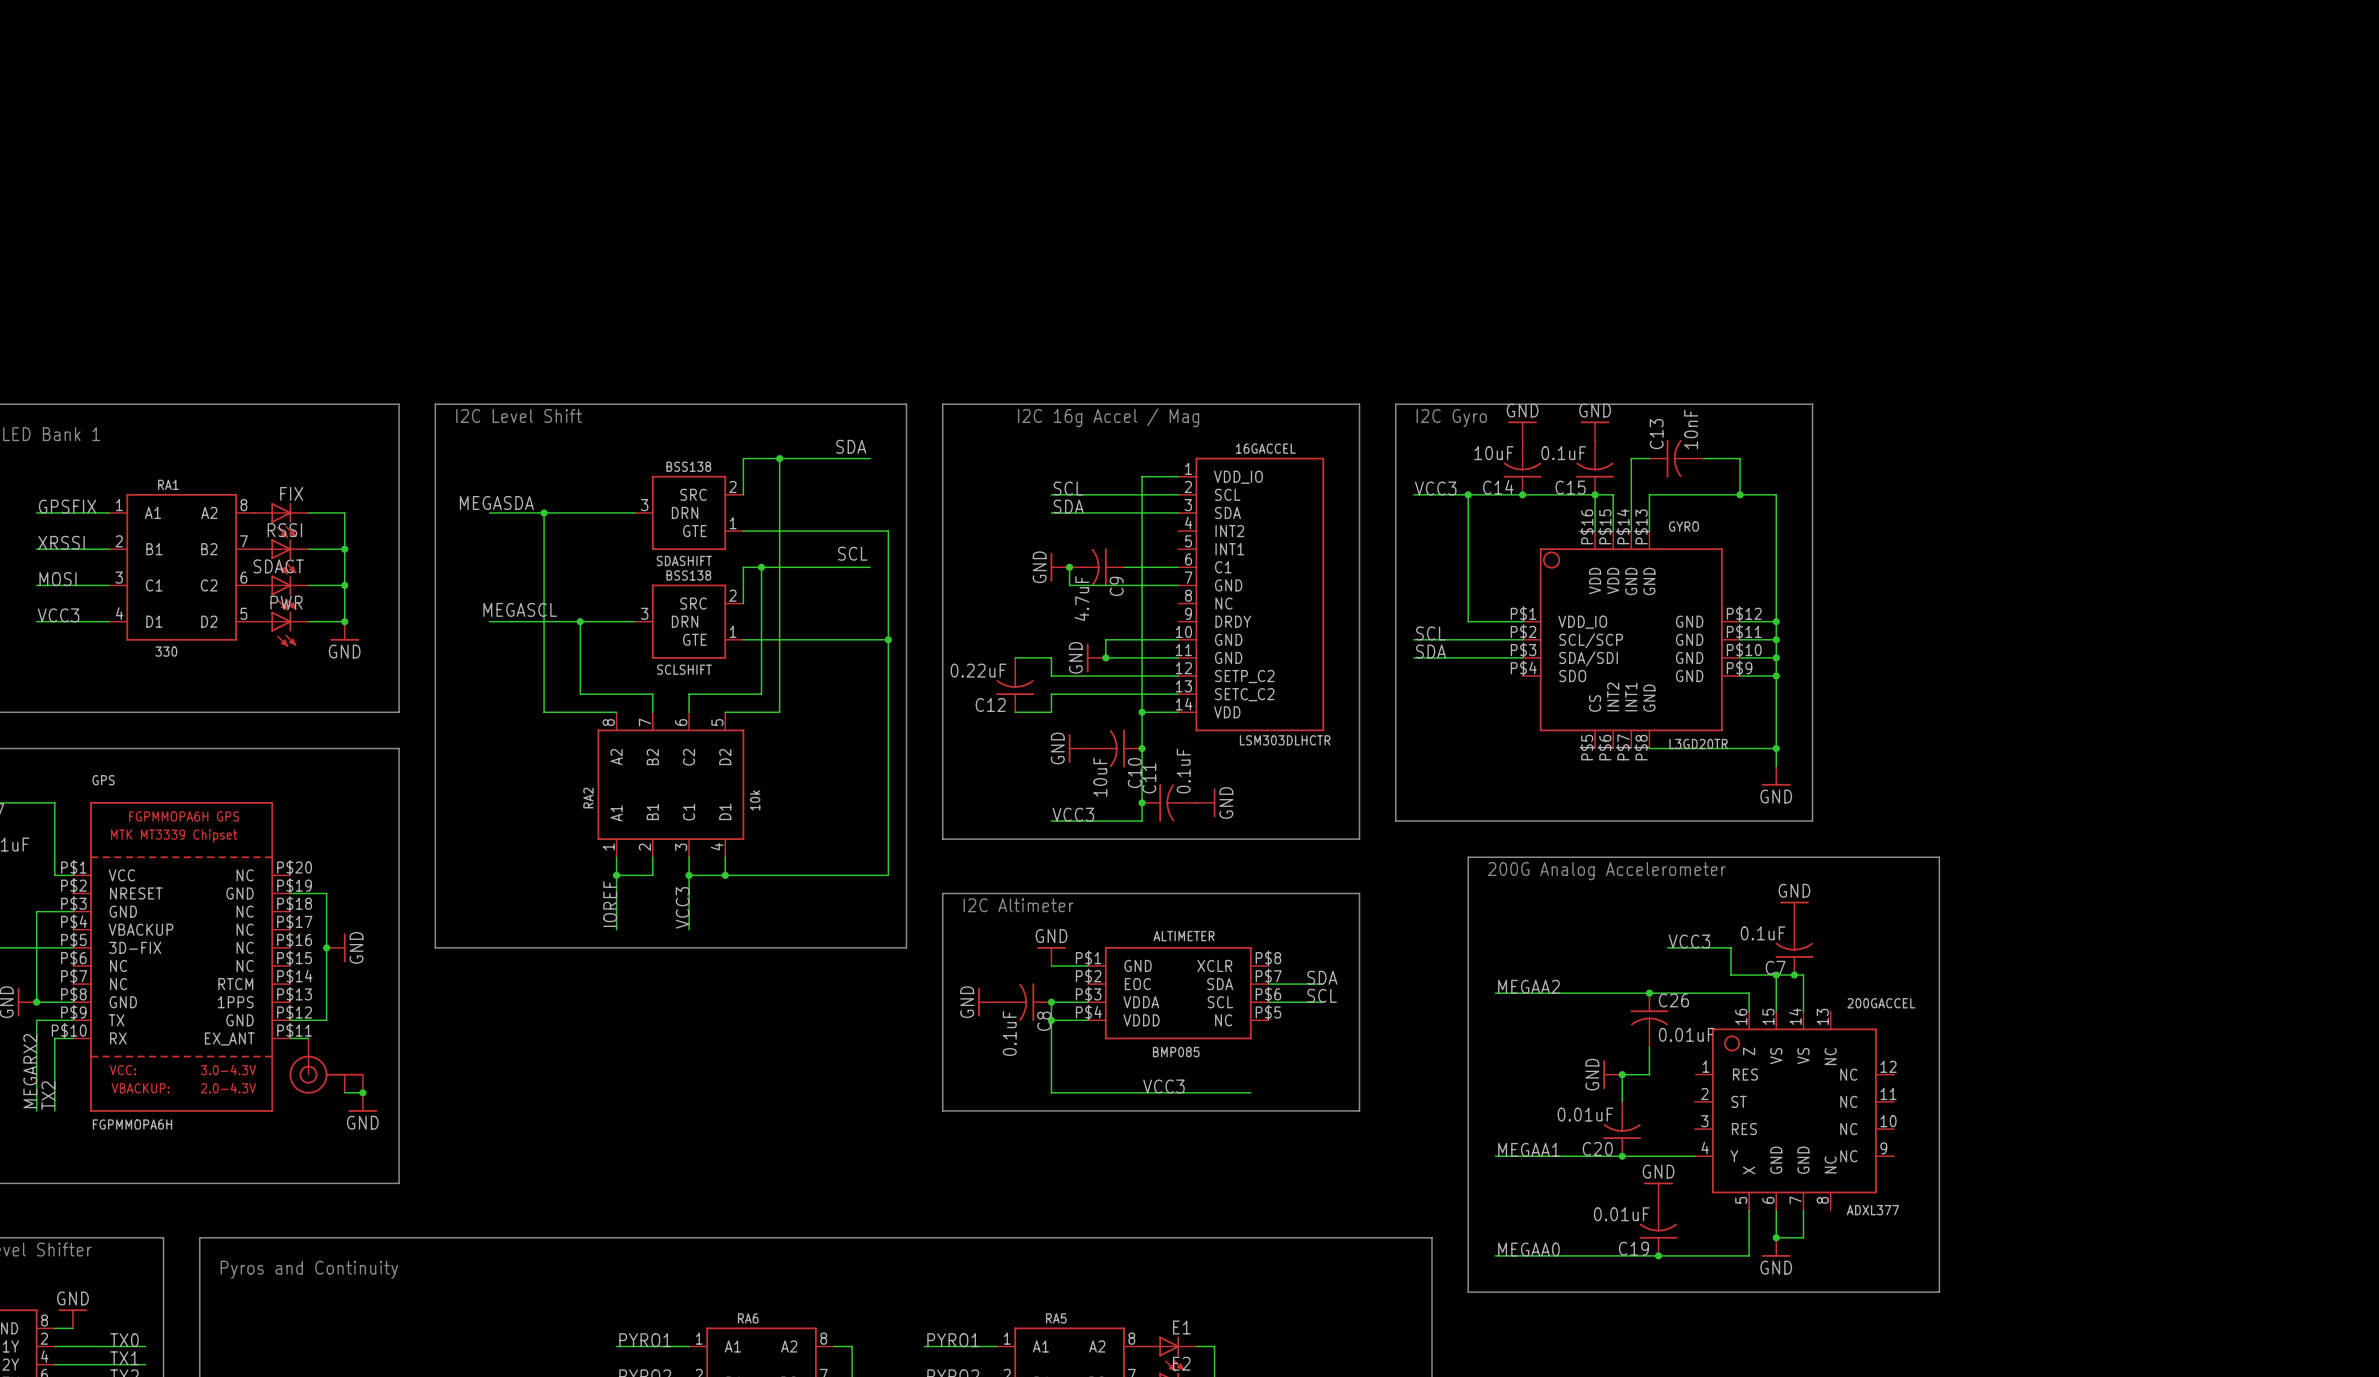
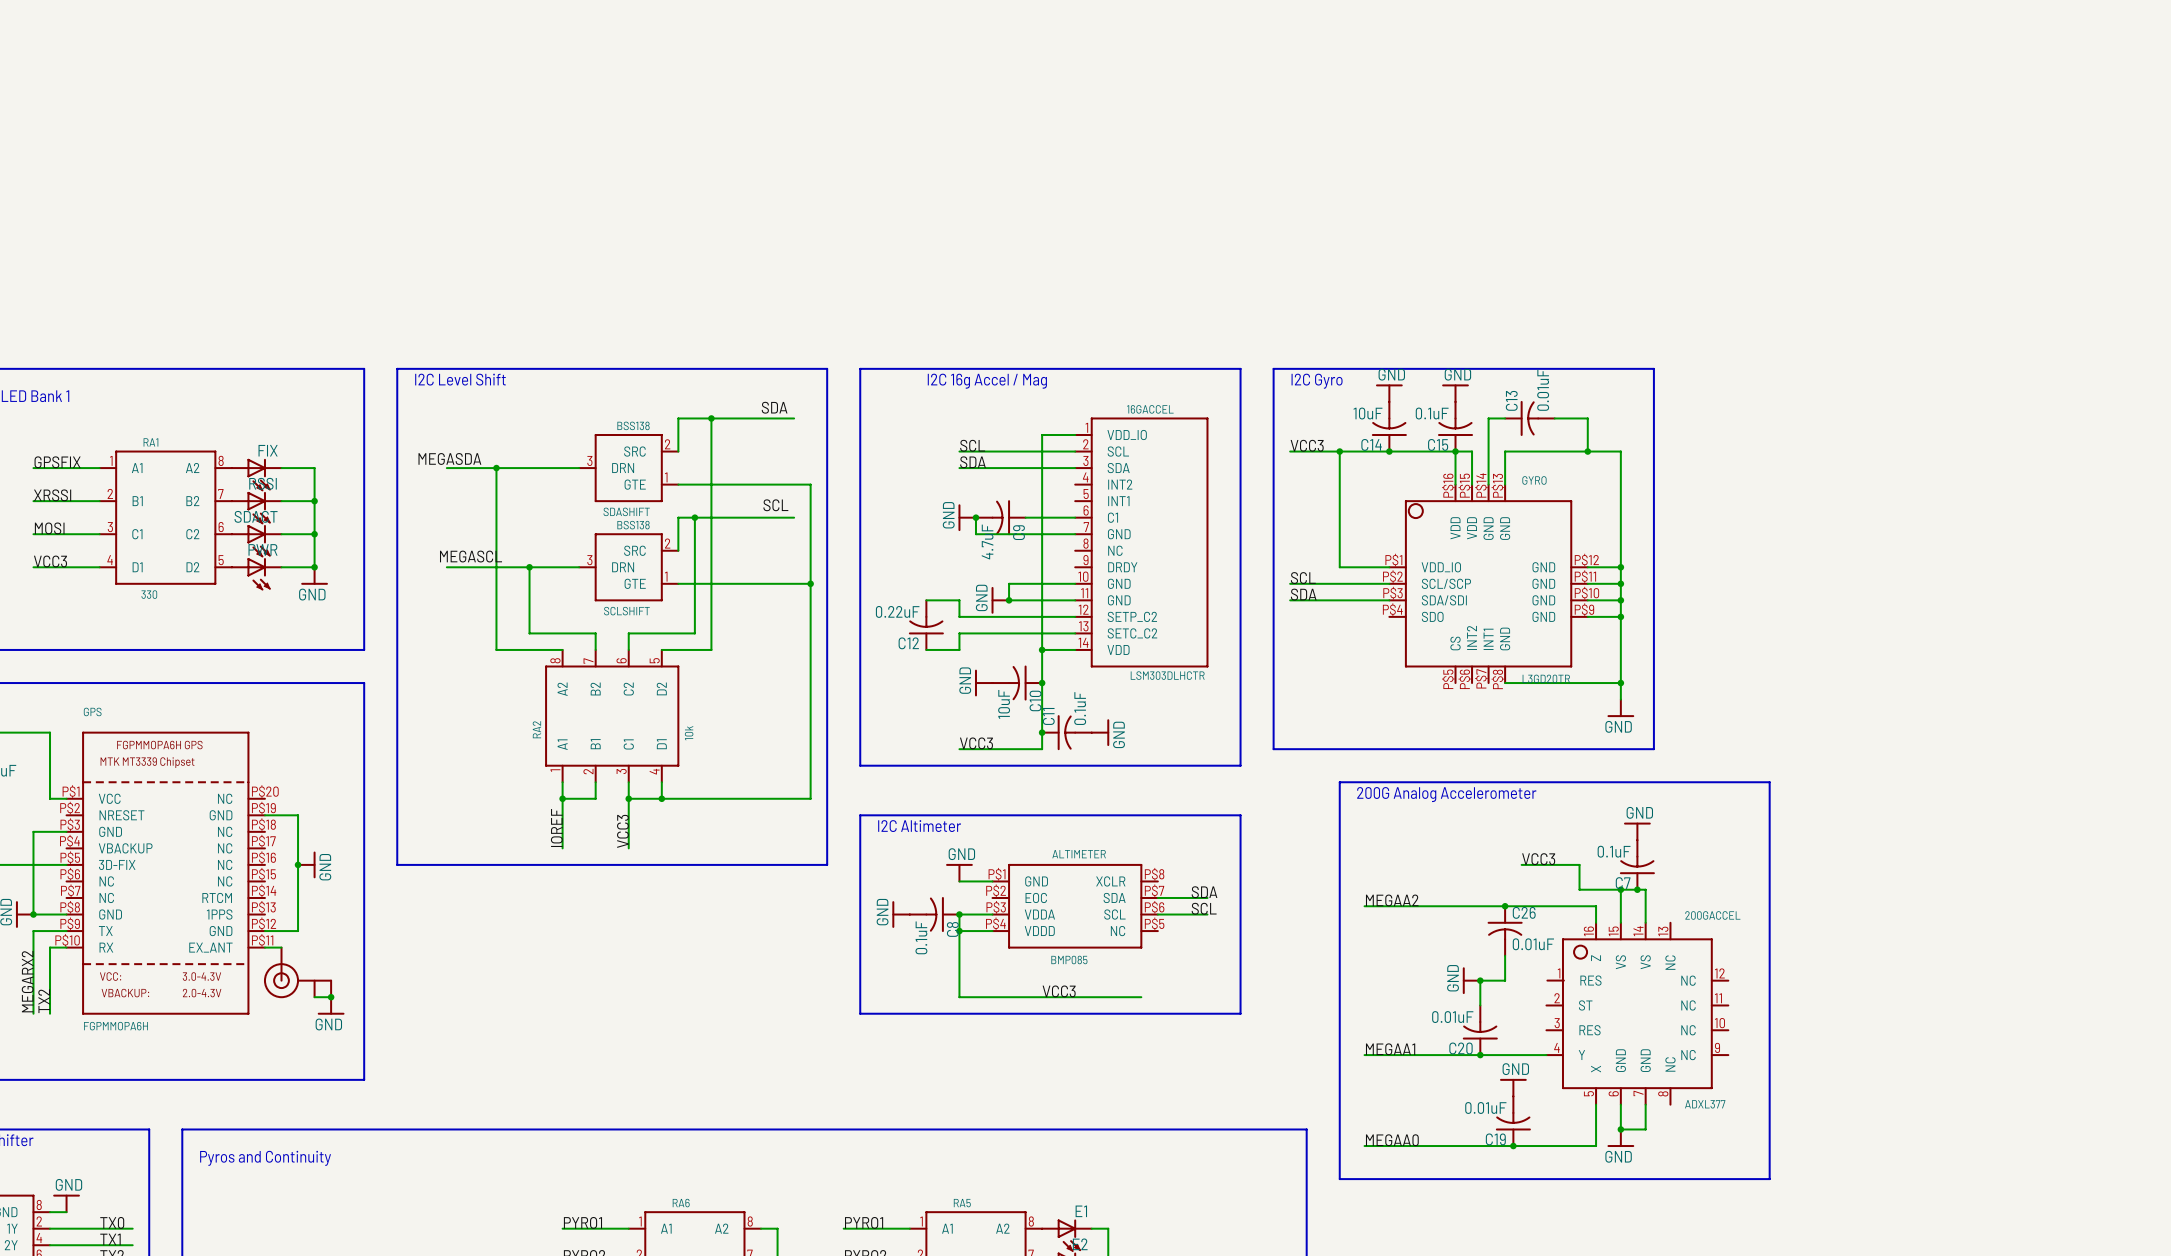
C13 value: 10nF (1691, 429) -> 0.01uF (1543, 390)

